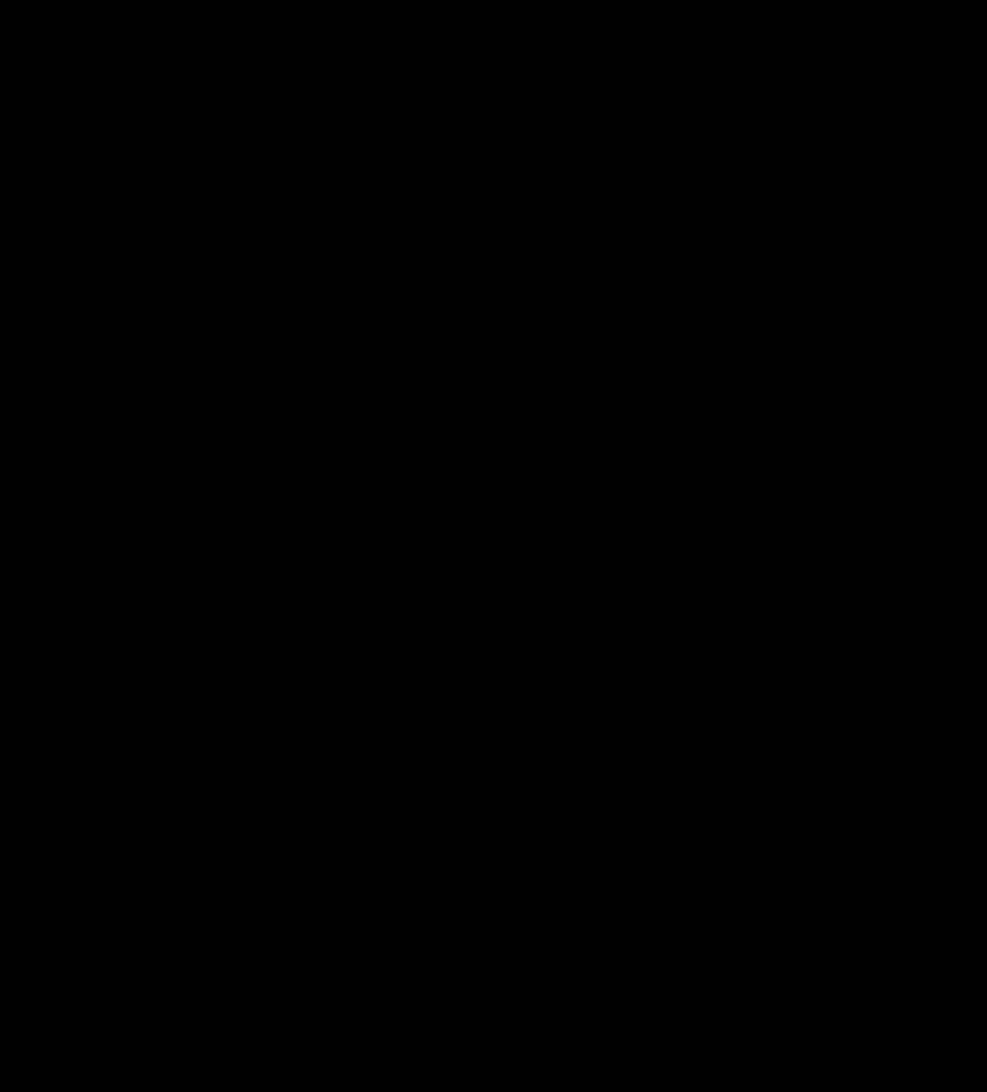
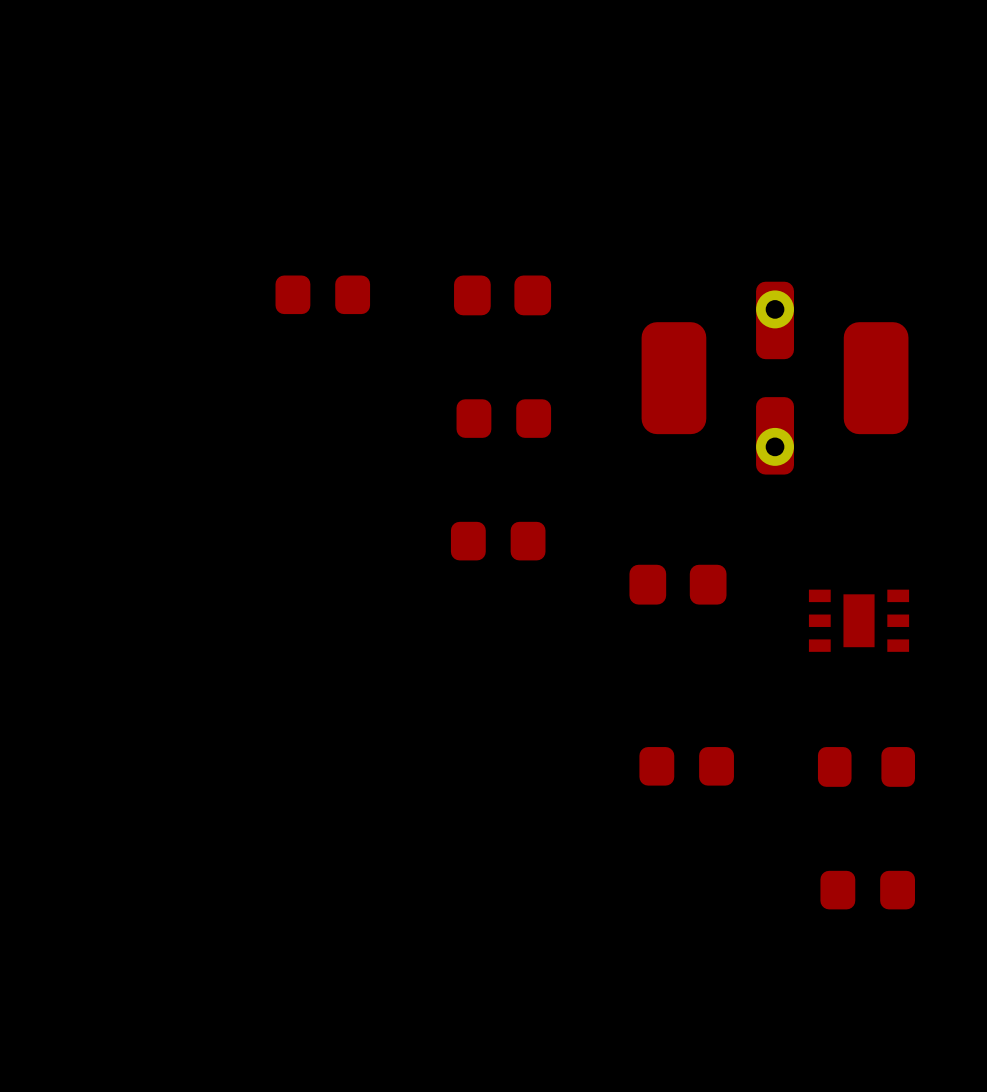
part: none -> (322, 294)
part: none -> (502, 295)
part: none -> (775, 378)
part: none -> (503, 418)
part: none -> (498, 541)
part: none -> (677, 584)
part: none -> (859, 620)
part: none -> (686, 766)
part: none -> (866, 766)
part: none -> (867, 890)

